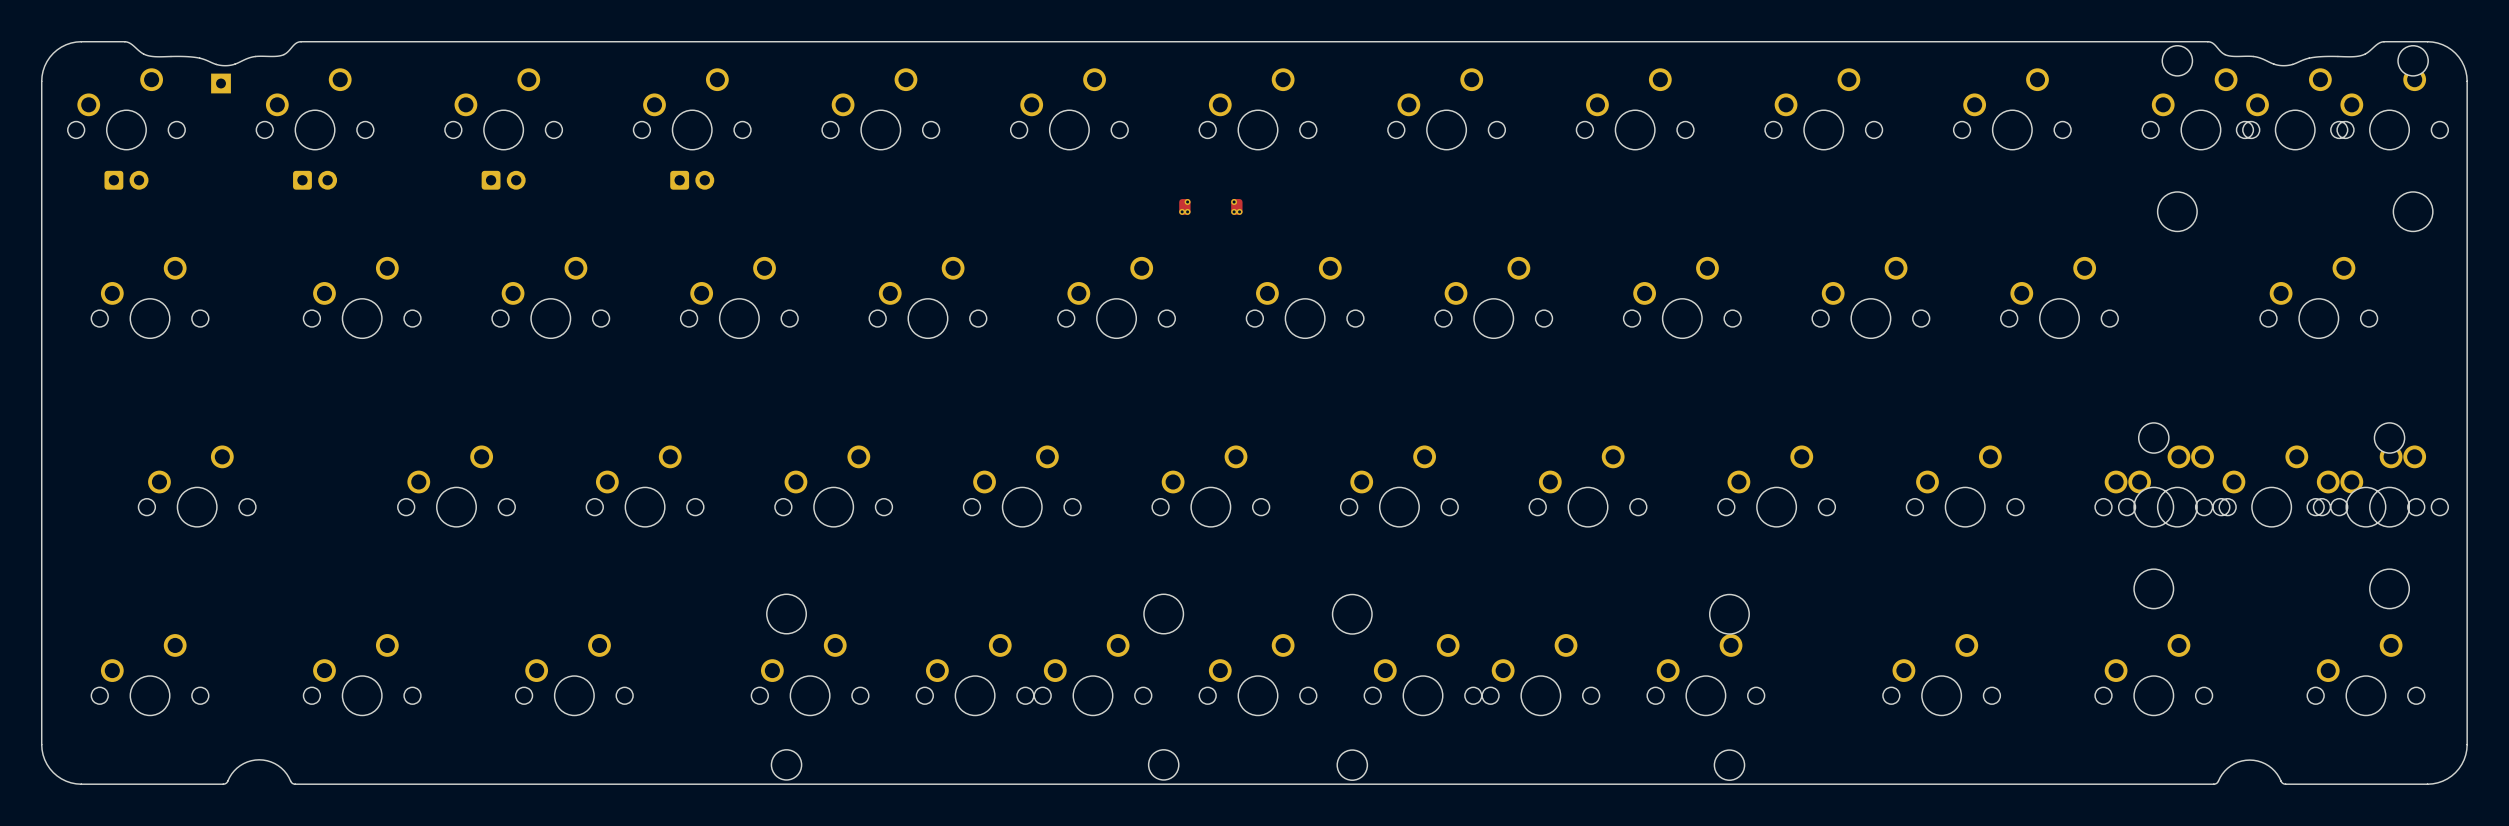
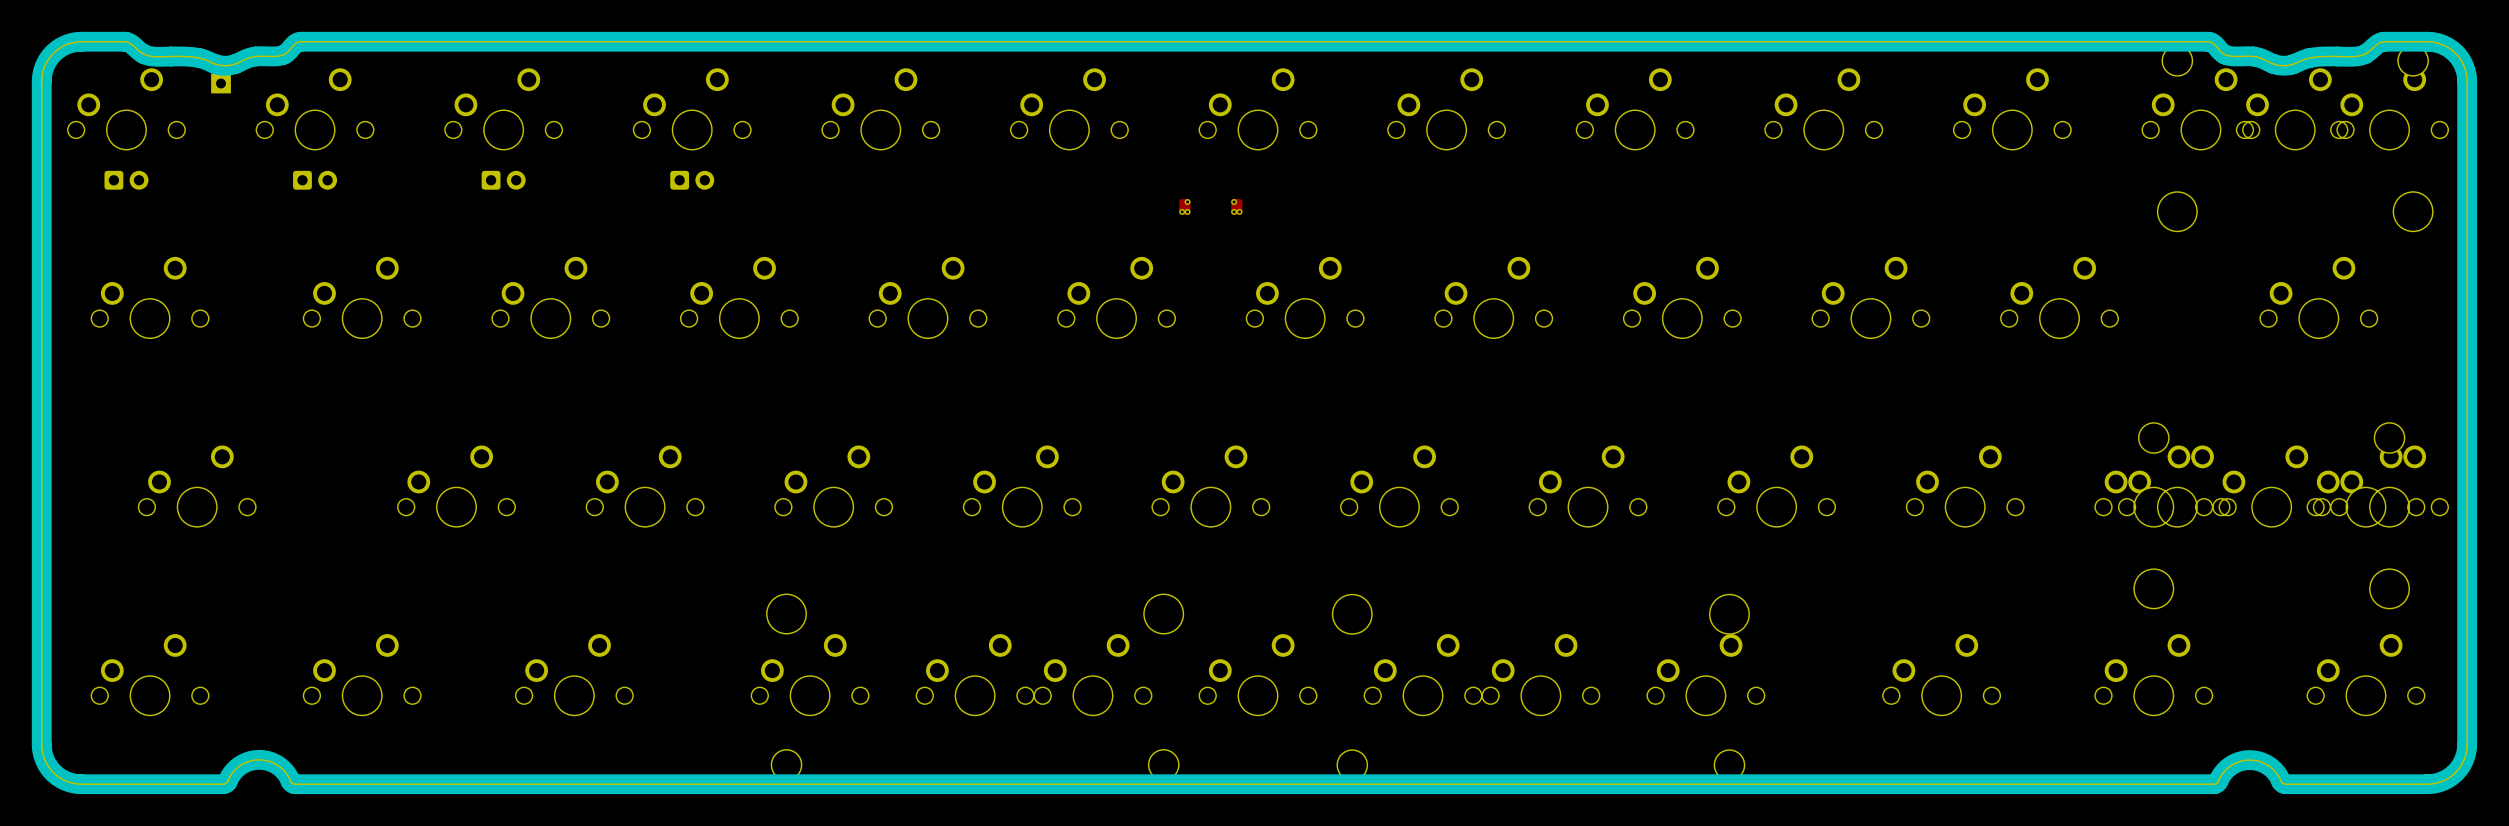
line: none -> (2383, 41) (2427, 41) (2442, 44) (2458, 57) (2466, 76) (2467, 744) (2464, 759) (2458, 768) (2447, 778) (2437, 782) (2285, 784) (2268, 765) (2249, 760) (2230, 765) (2222, 774) (2217, 782) (2213, 784) (295, 784) (291, 782) (286, 774) (278, 765) (259, 759) (240, 765) (223, 784) (81, 784) (71, 782) (57, 776) (49, 768) (43, 754) (41, 81) (43, 71) (49, 57) (61, 47) (71, 43) (126, 41) (147, 55) (195, 57) (225, 65) (253, 56) (282, 55) (296, 43) (301, 41) (2207, 41) (2212, 43) (2226, 55) (2254, 56) (2283, 65) (2313, 57) (2361, 55) (2378, 43) (2381, 42) (2382, 41) (2384, 41)

